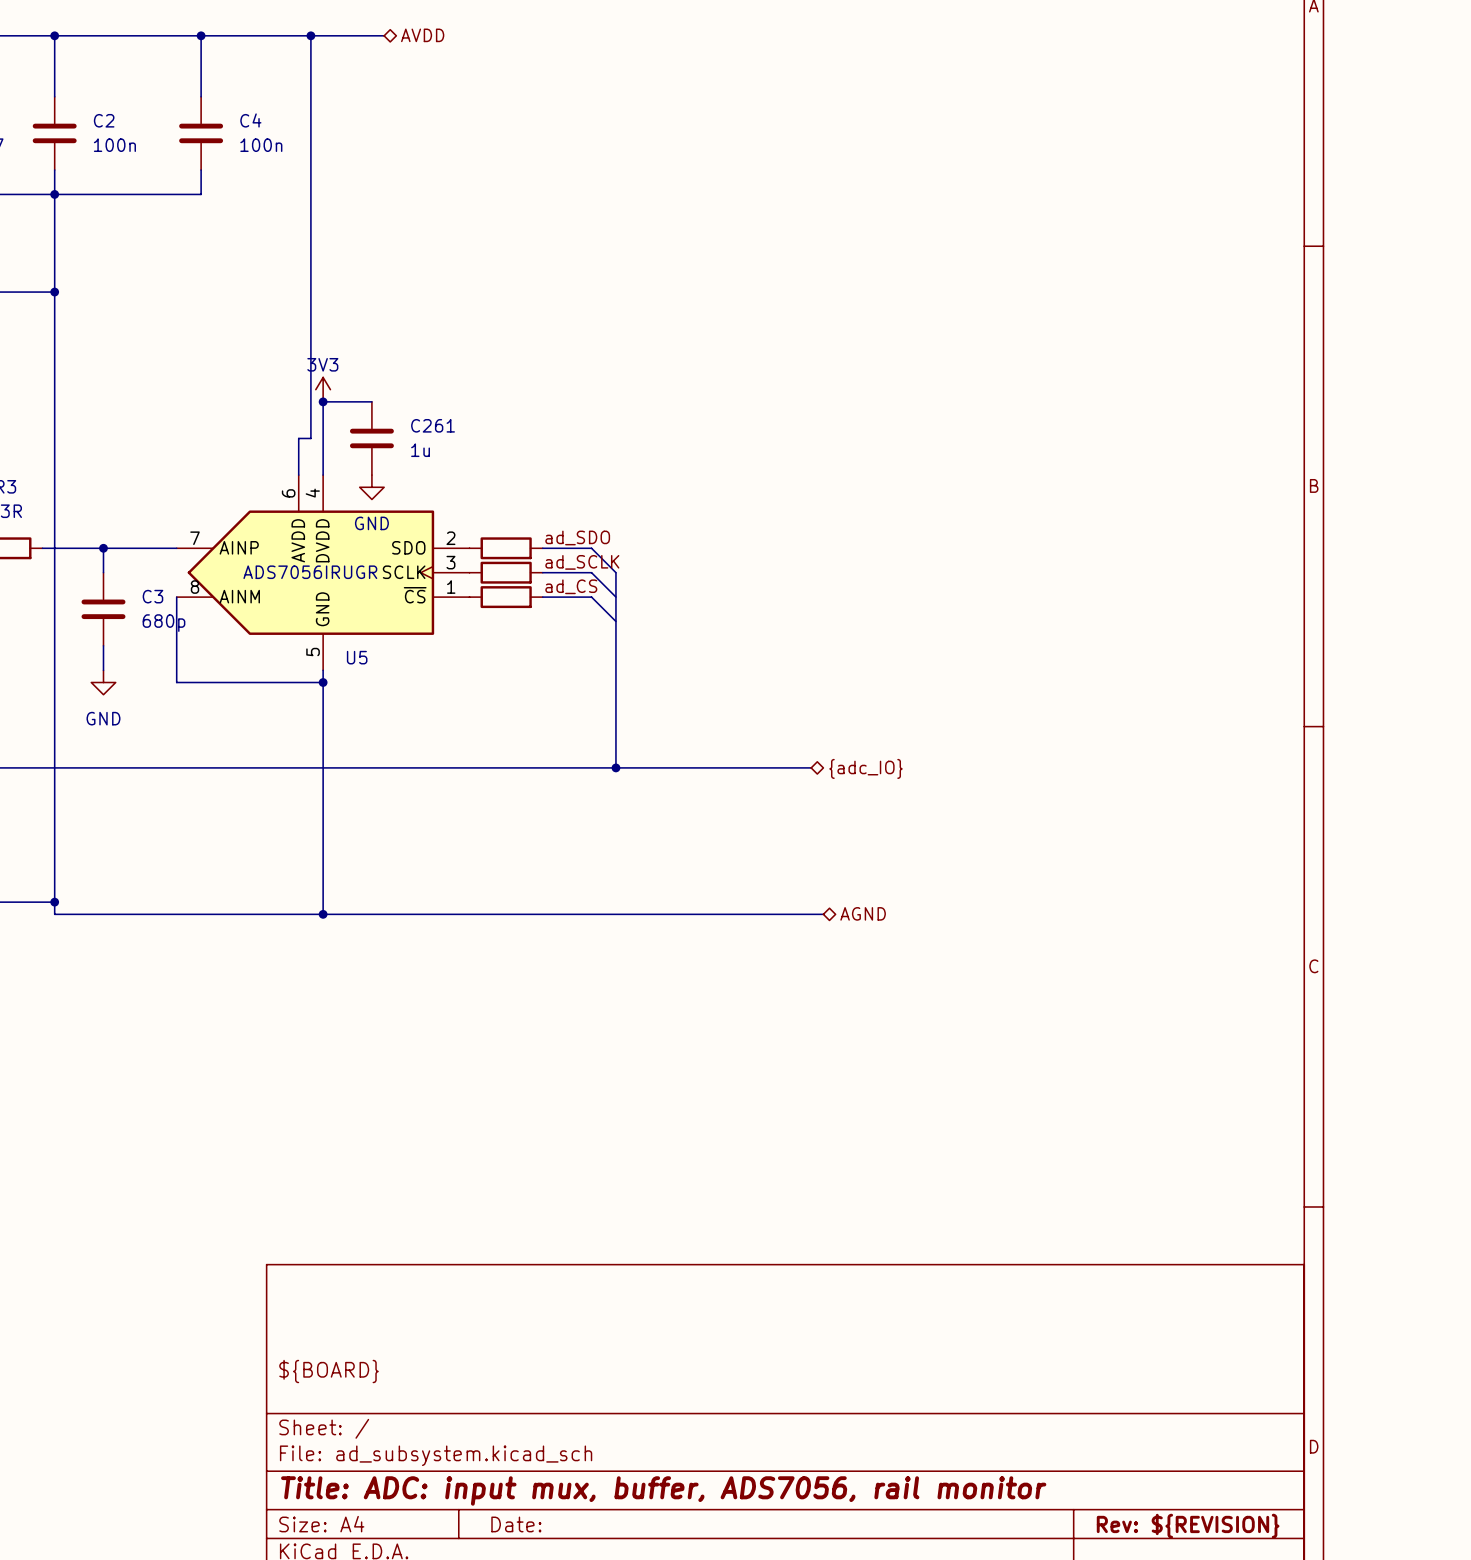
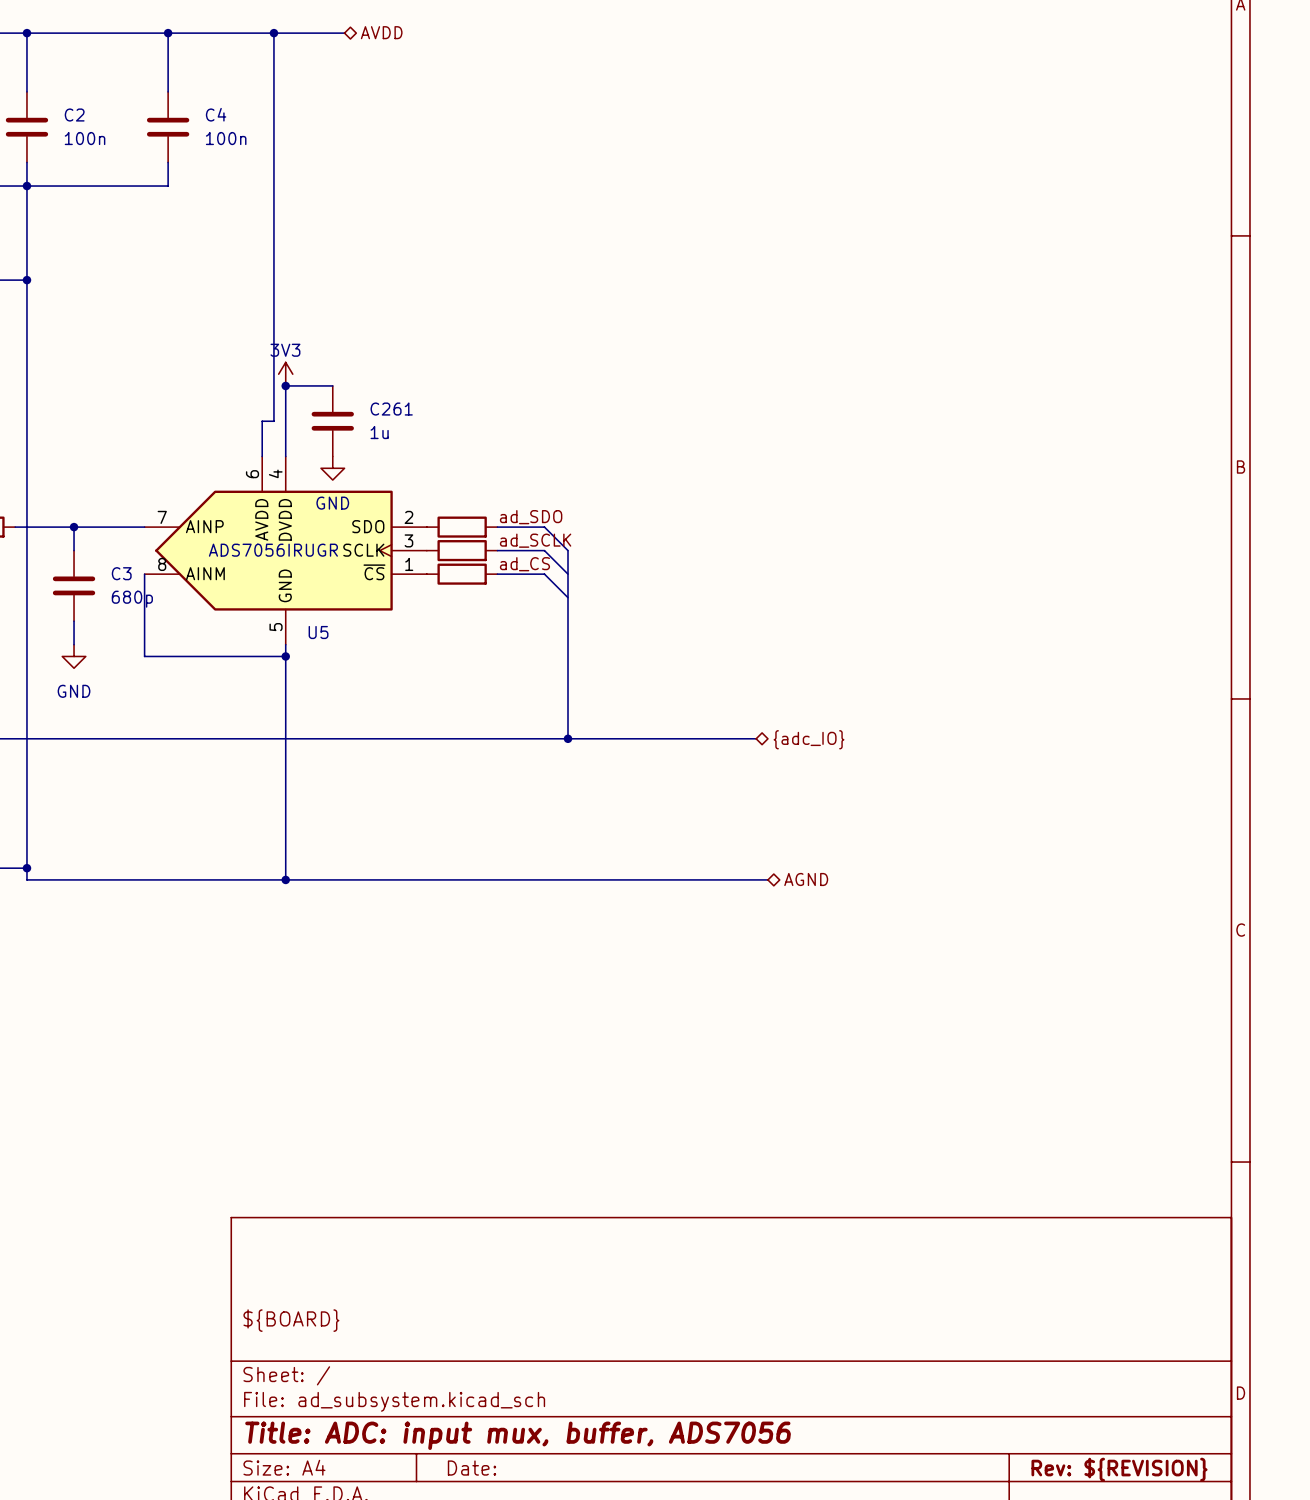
title block: Title: ADC: input mux, buffer, ADS7056, rail monitor (663, 1490) -> Title: ADC: input mux, buffer, ADS7056 (518, 1435)

